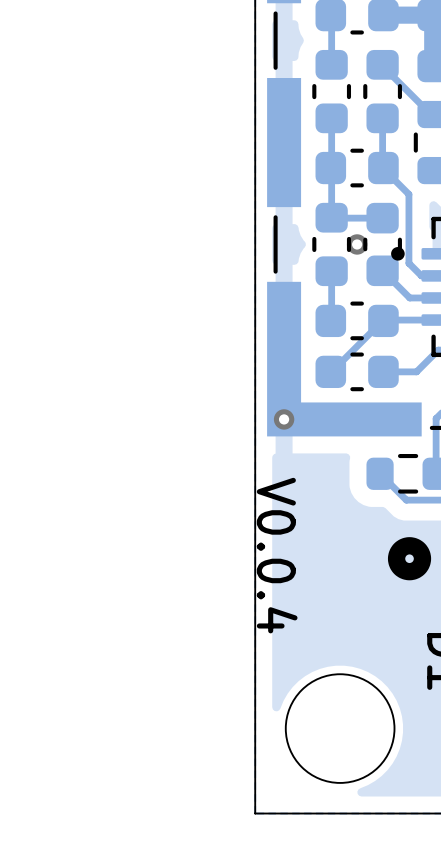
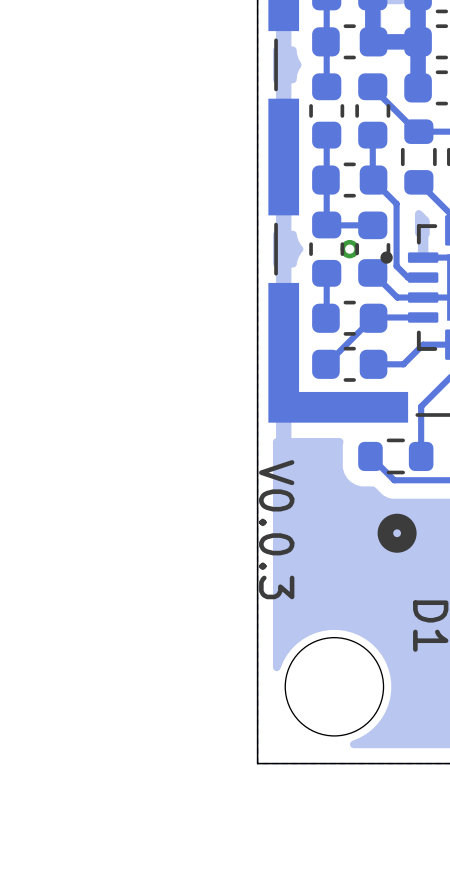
via: (284, 419) -> none
text: V0.0.4 (277, 555) -> V0.0.3 (276, 529)

